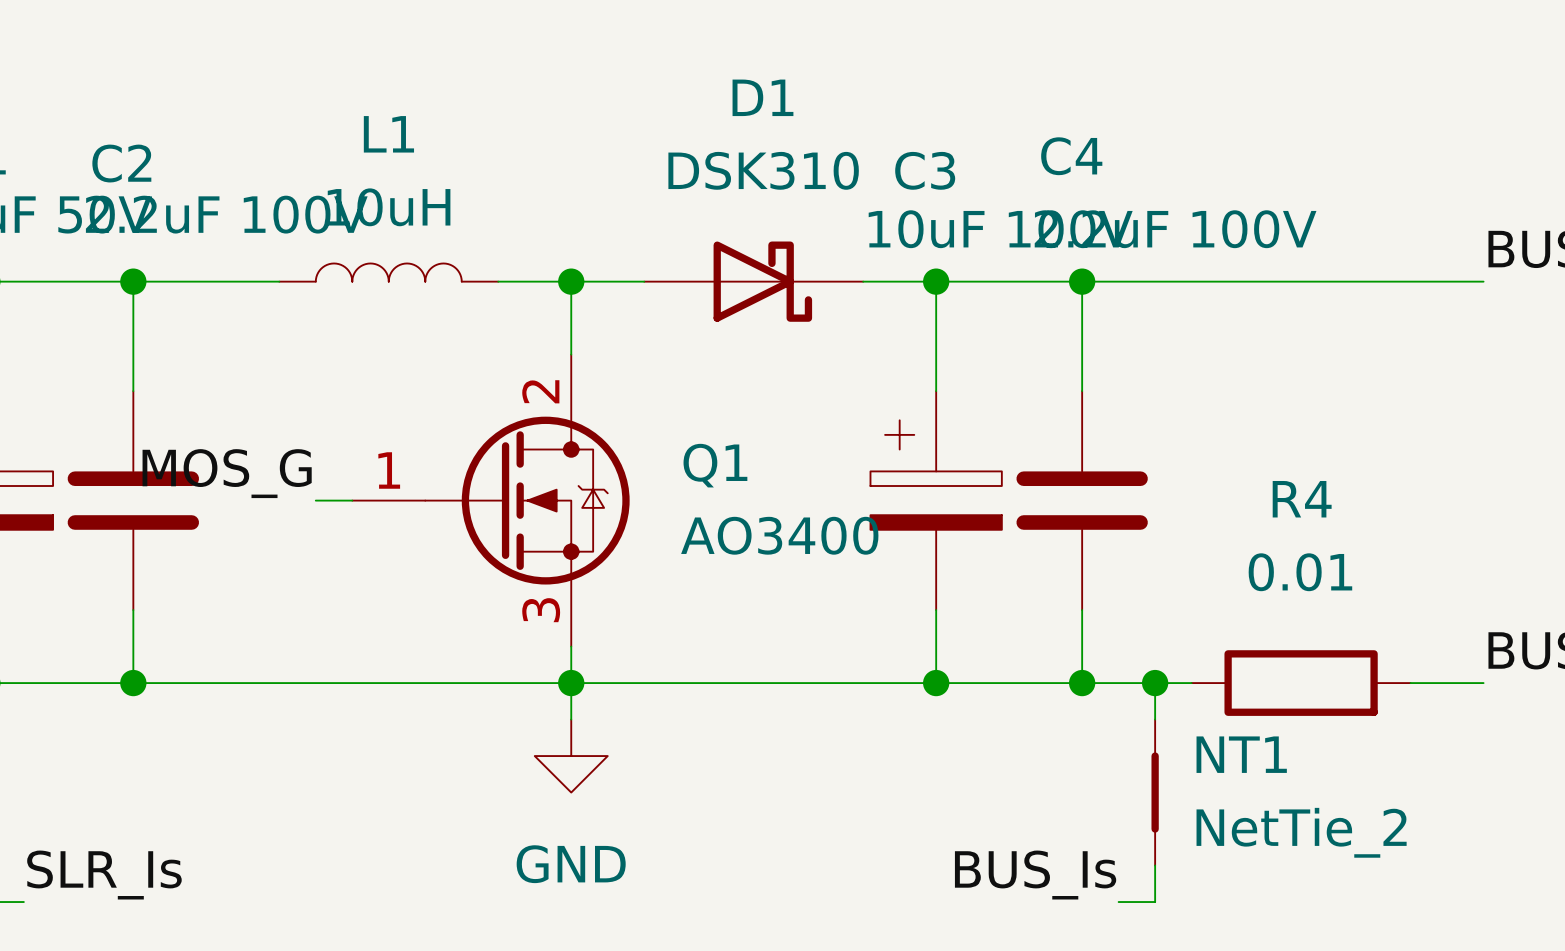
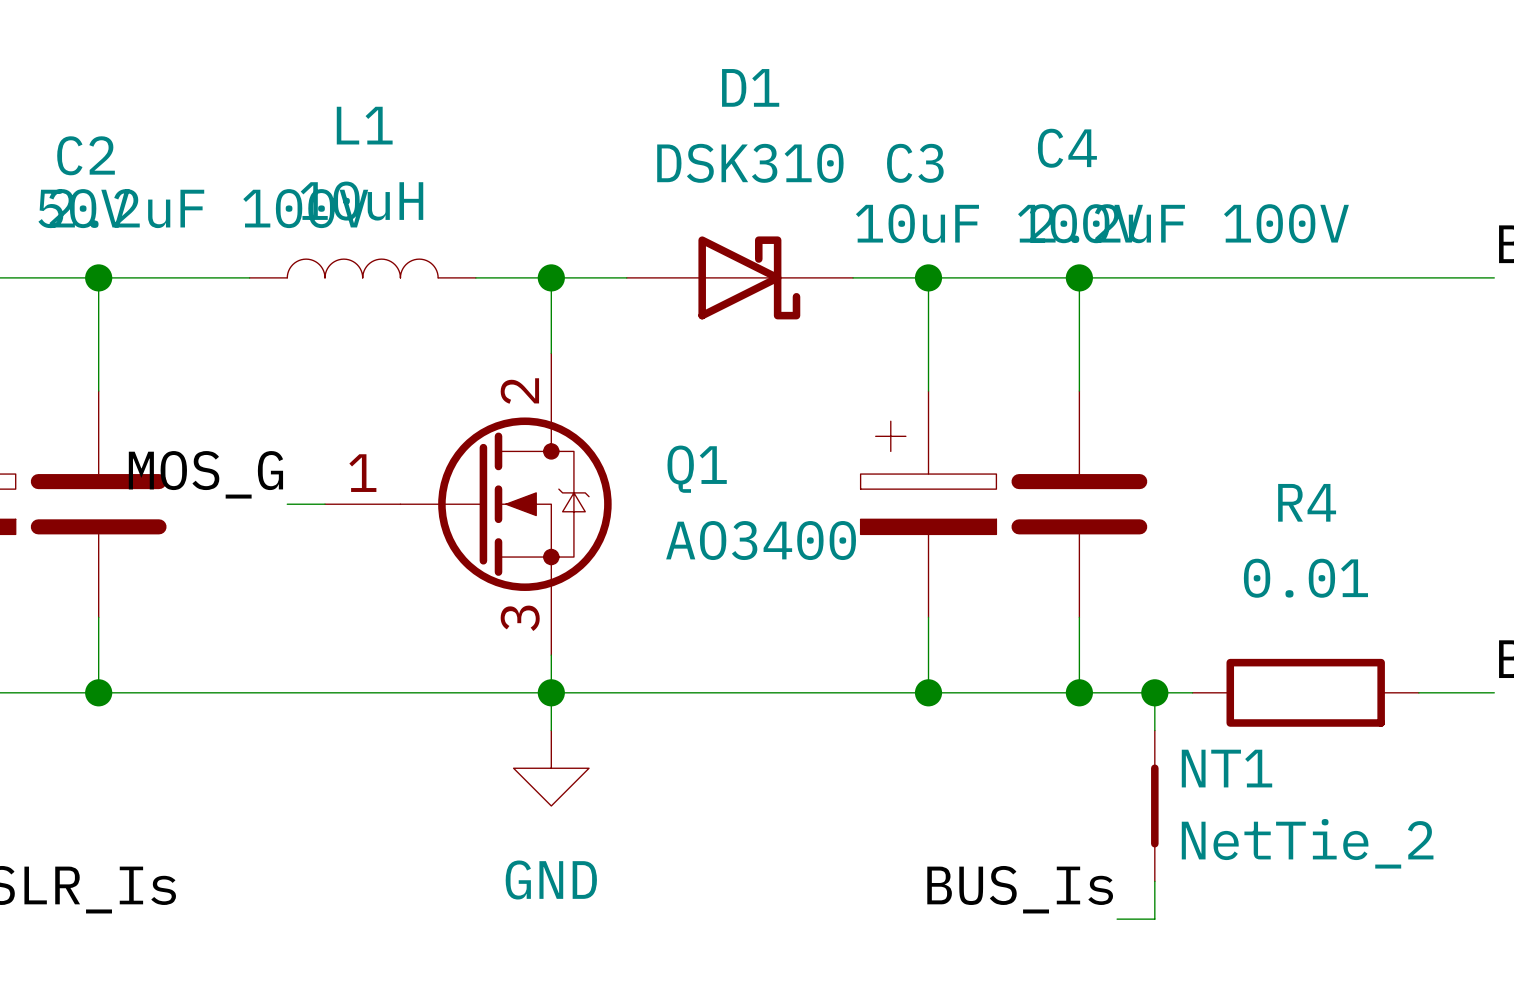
NT1 name position: NT1 (1241, 754) -> NT1 (1226, 768)
NT1 value position: NetTie_2 (1301, 832) -> NetTie_2 (1307, 843)

